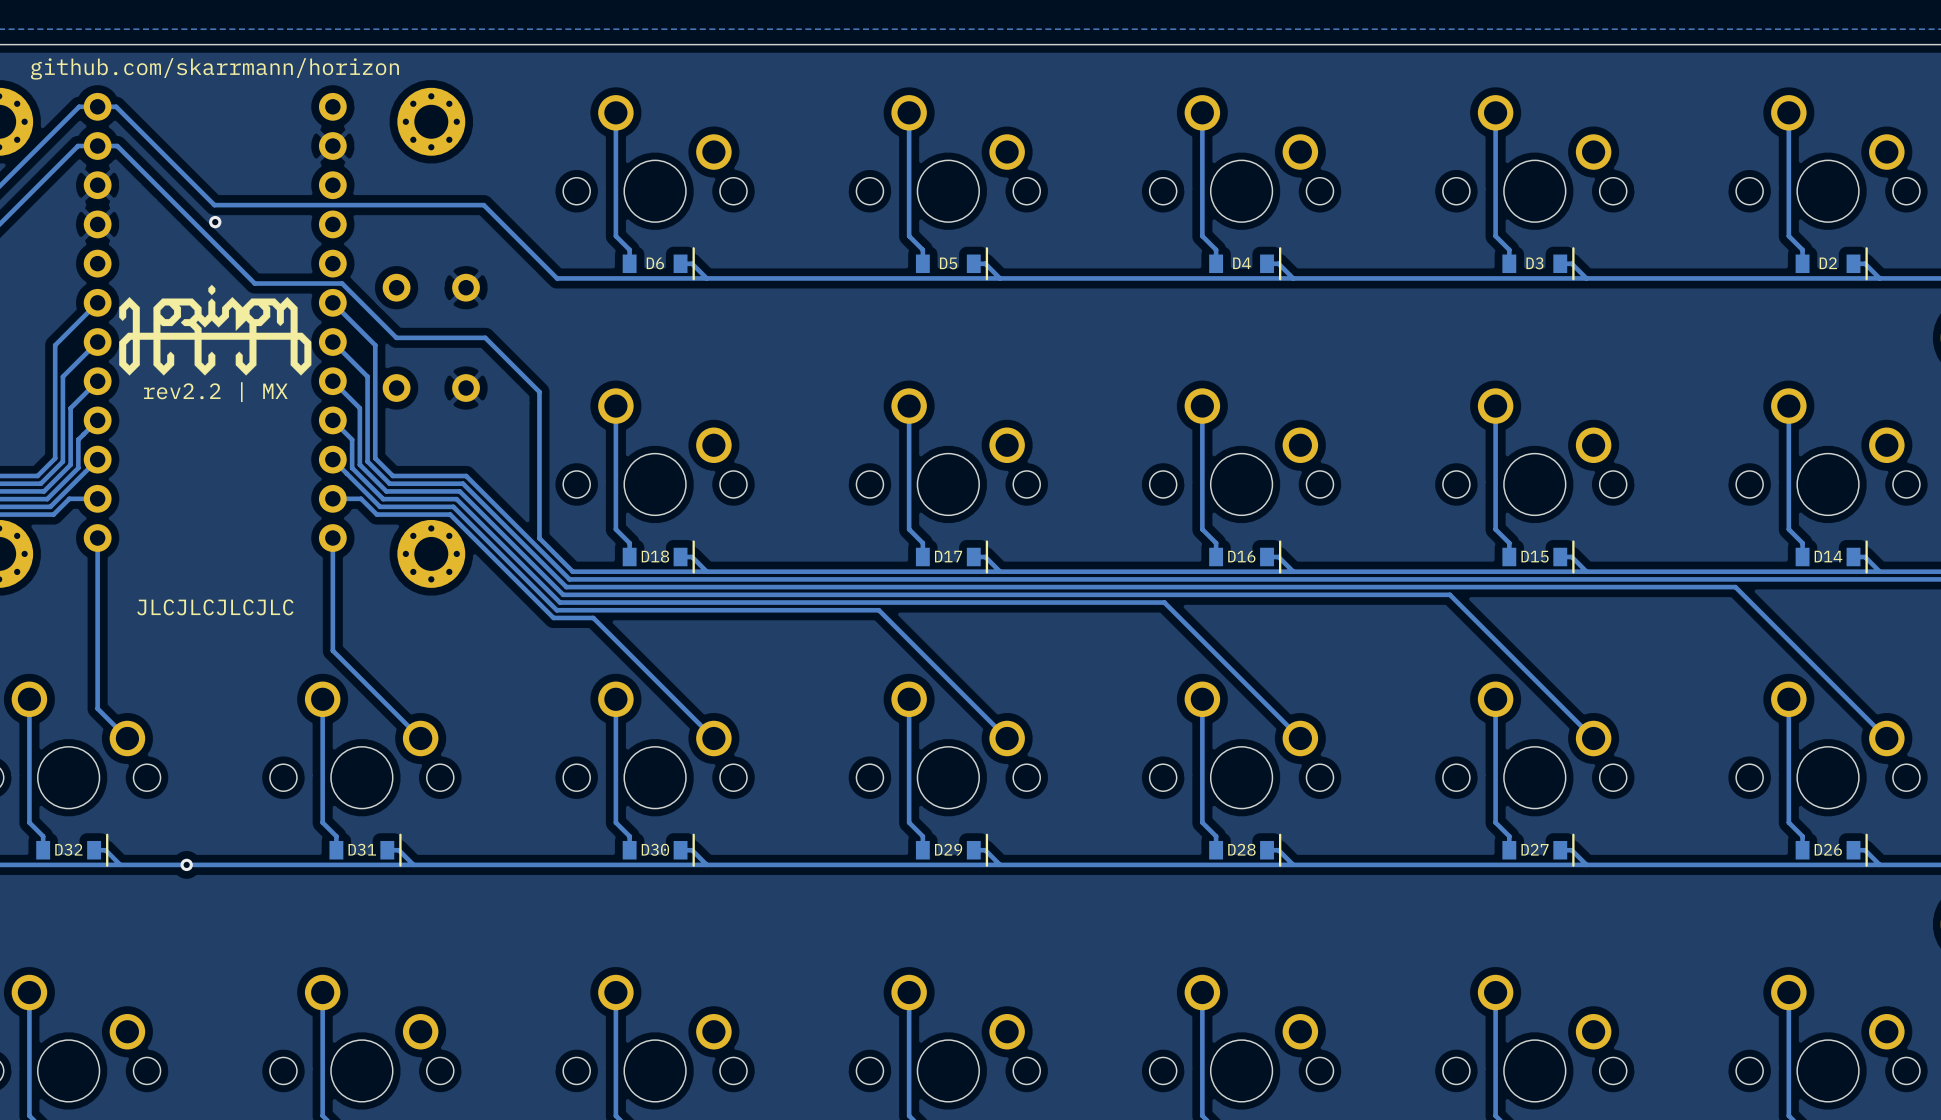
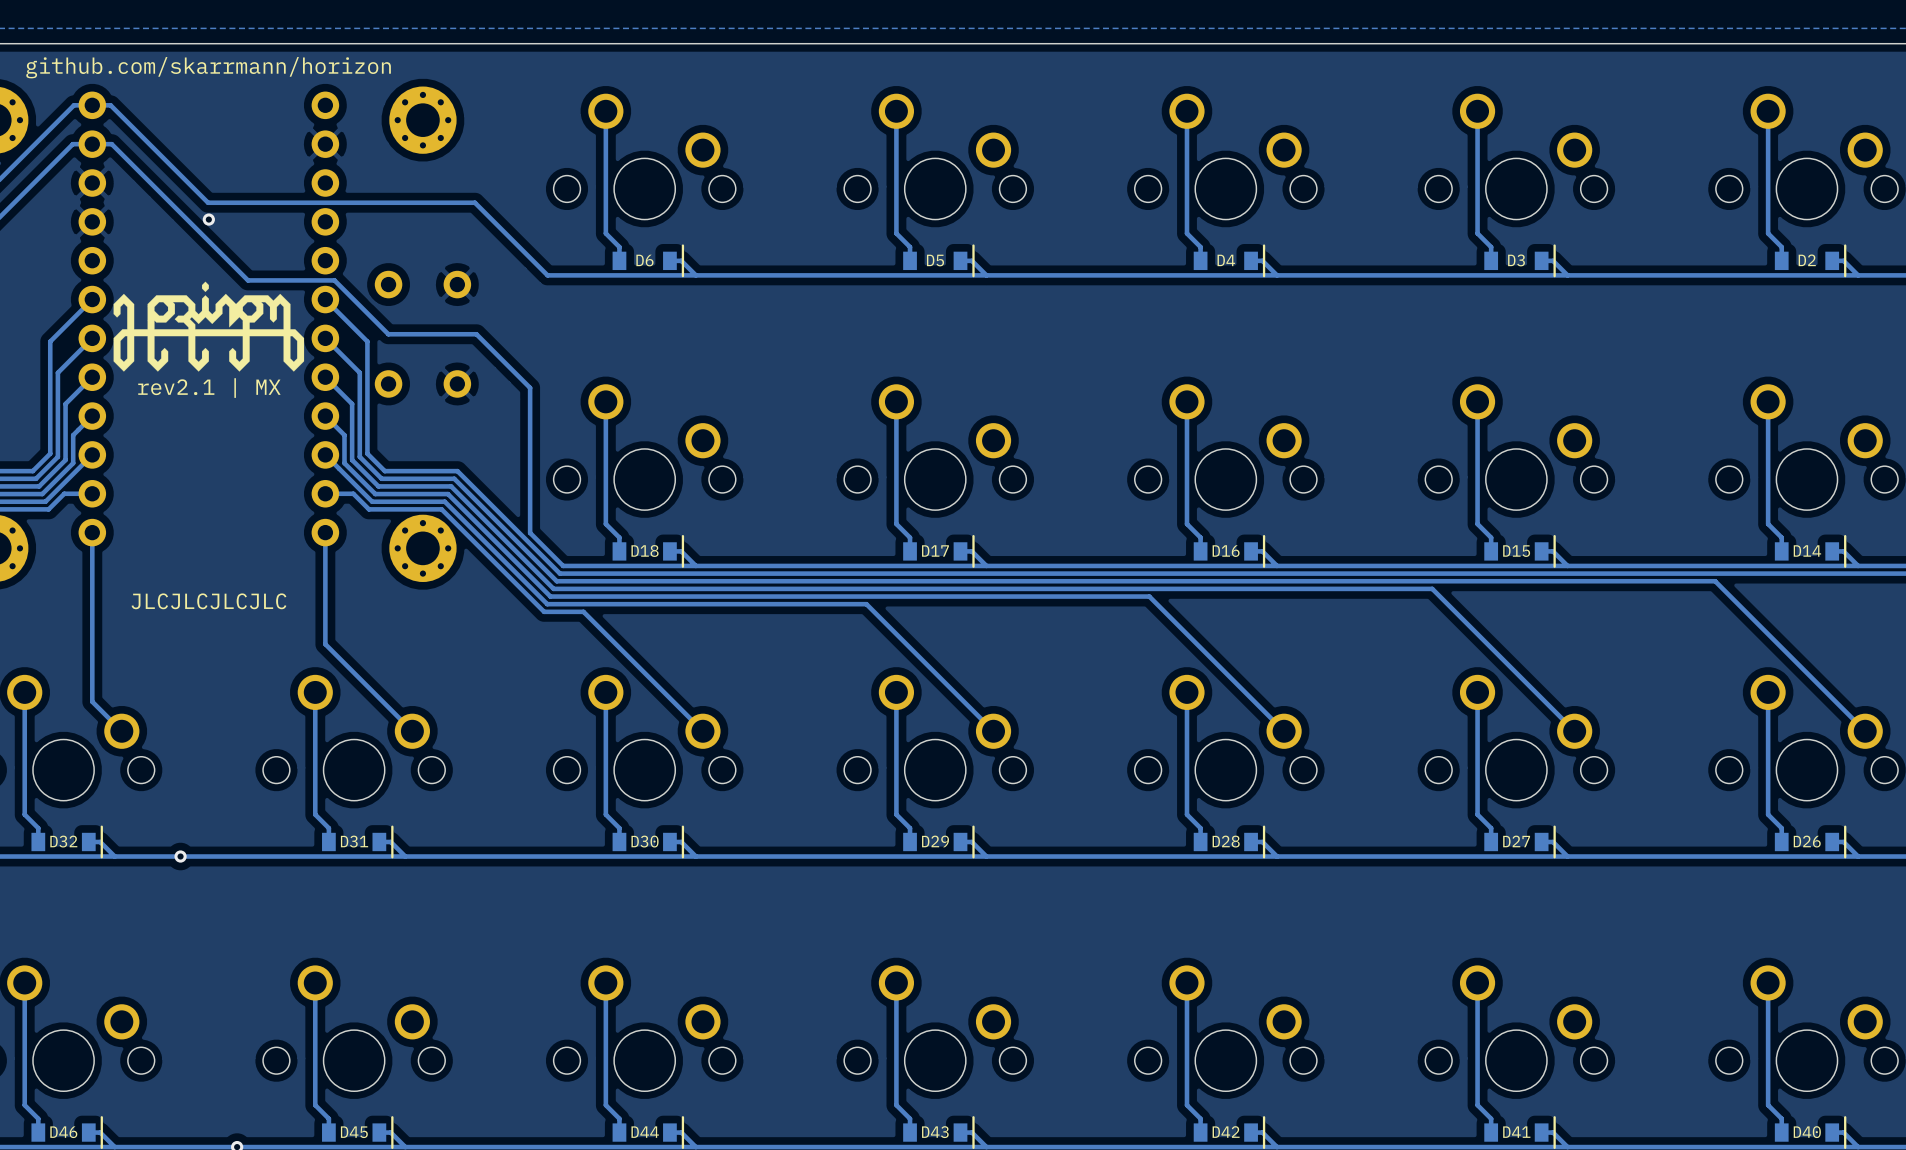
text: rev2.2 | MX (215, 392) -> rev2.1 | MX (209, 388)

